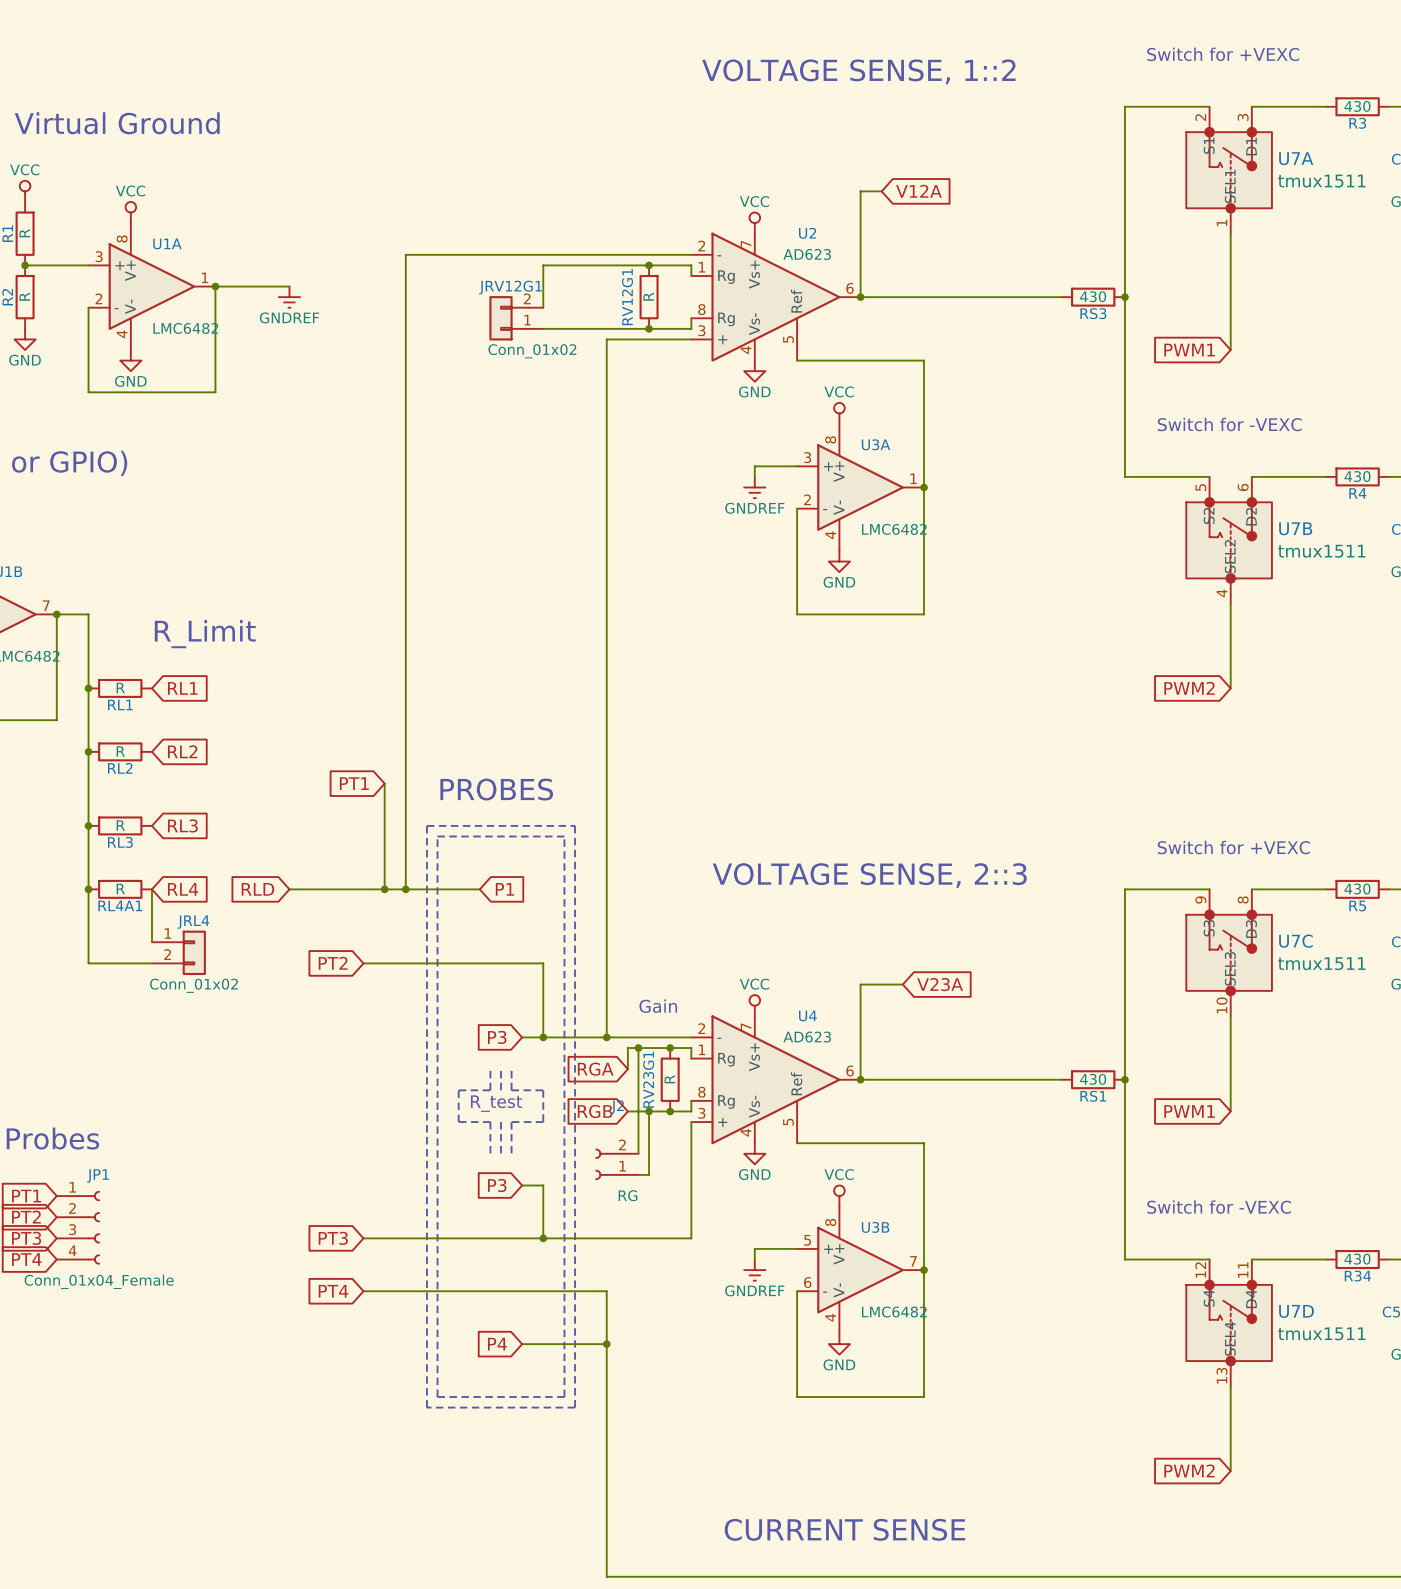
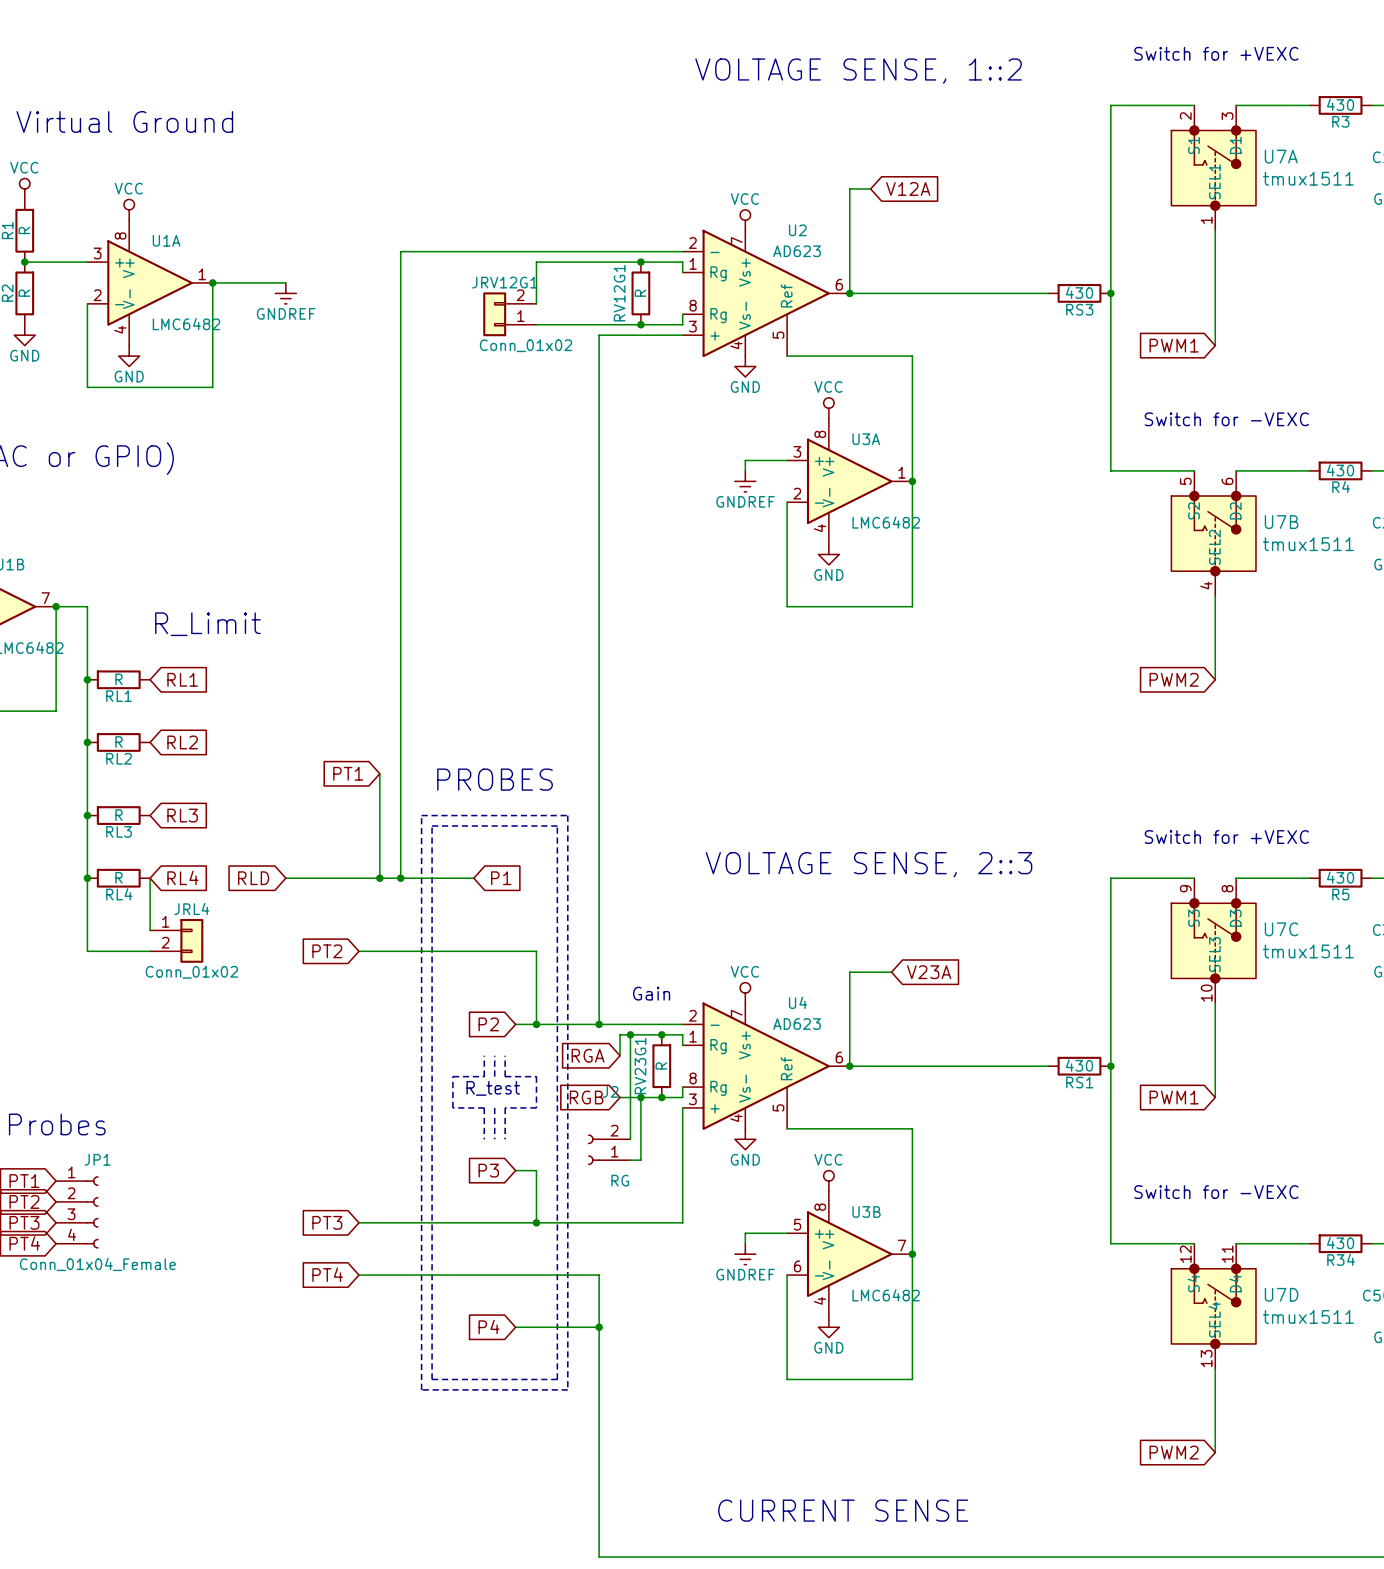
RL4A1 name: RL4A1 (120, 905) -> RL4 (119, 894)
global label: P3 (497, 1037) -> P2 (488, 1024)

